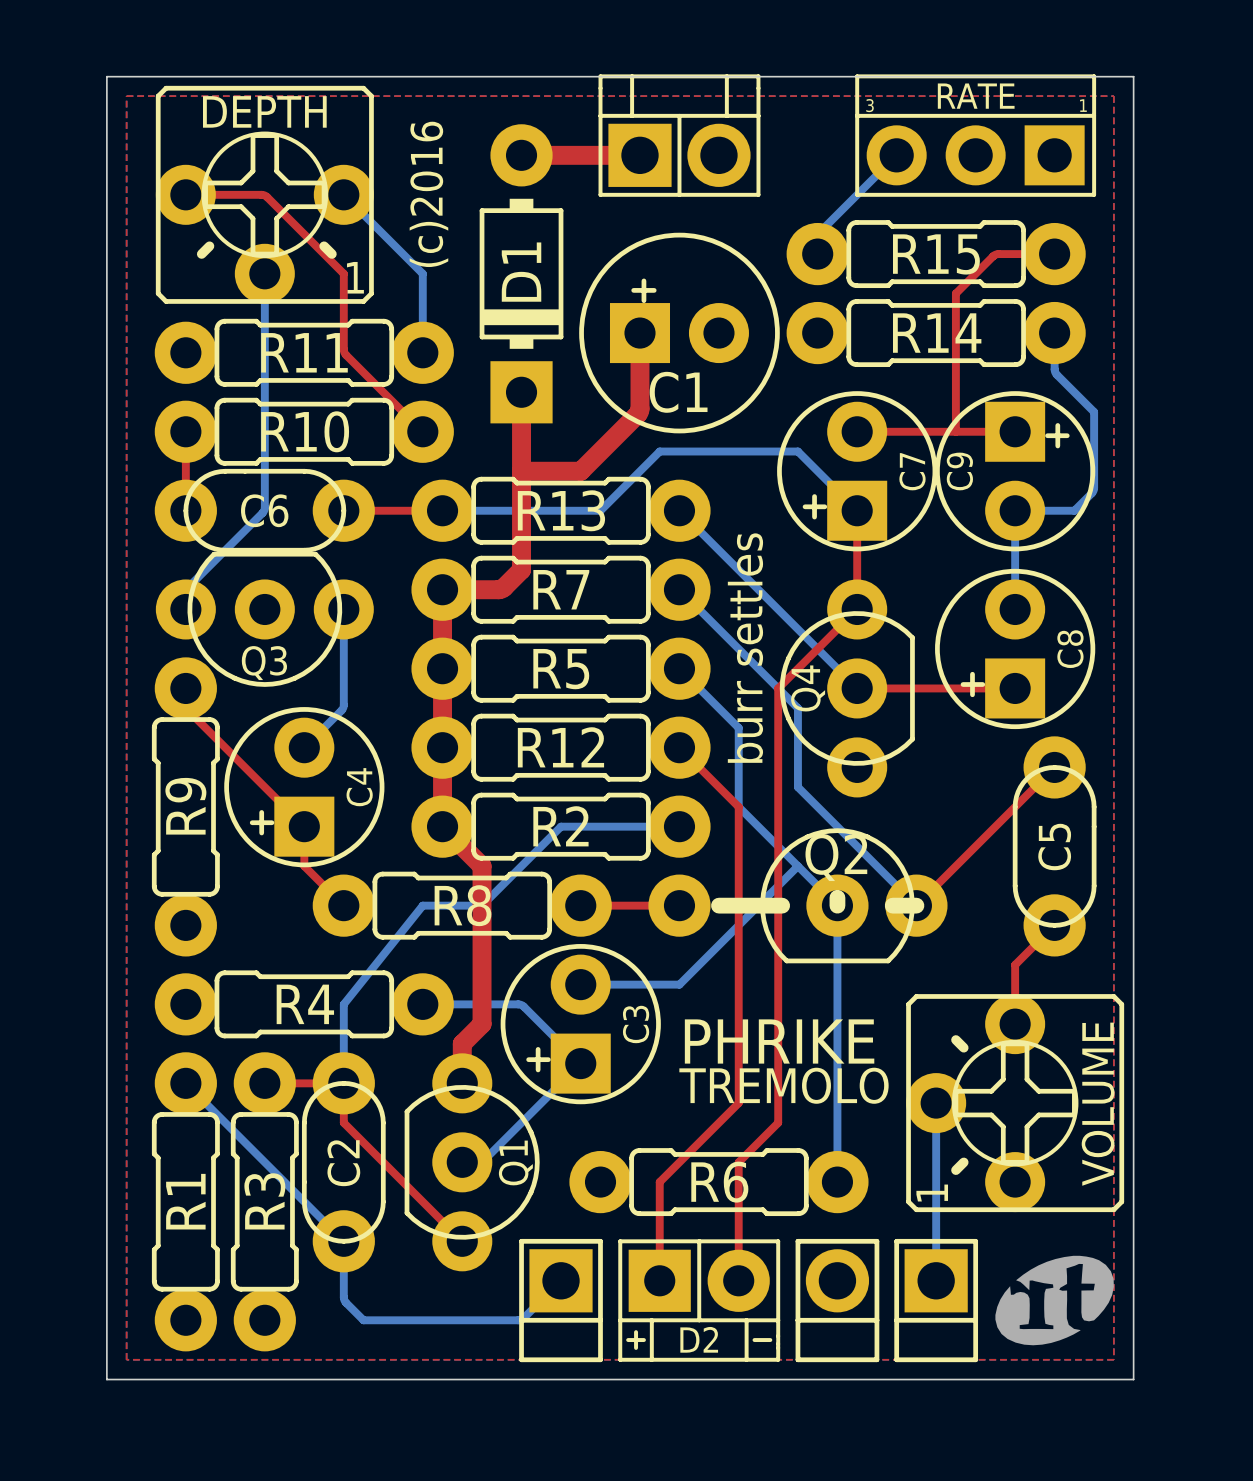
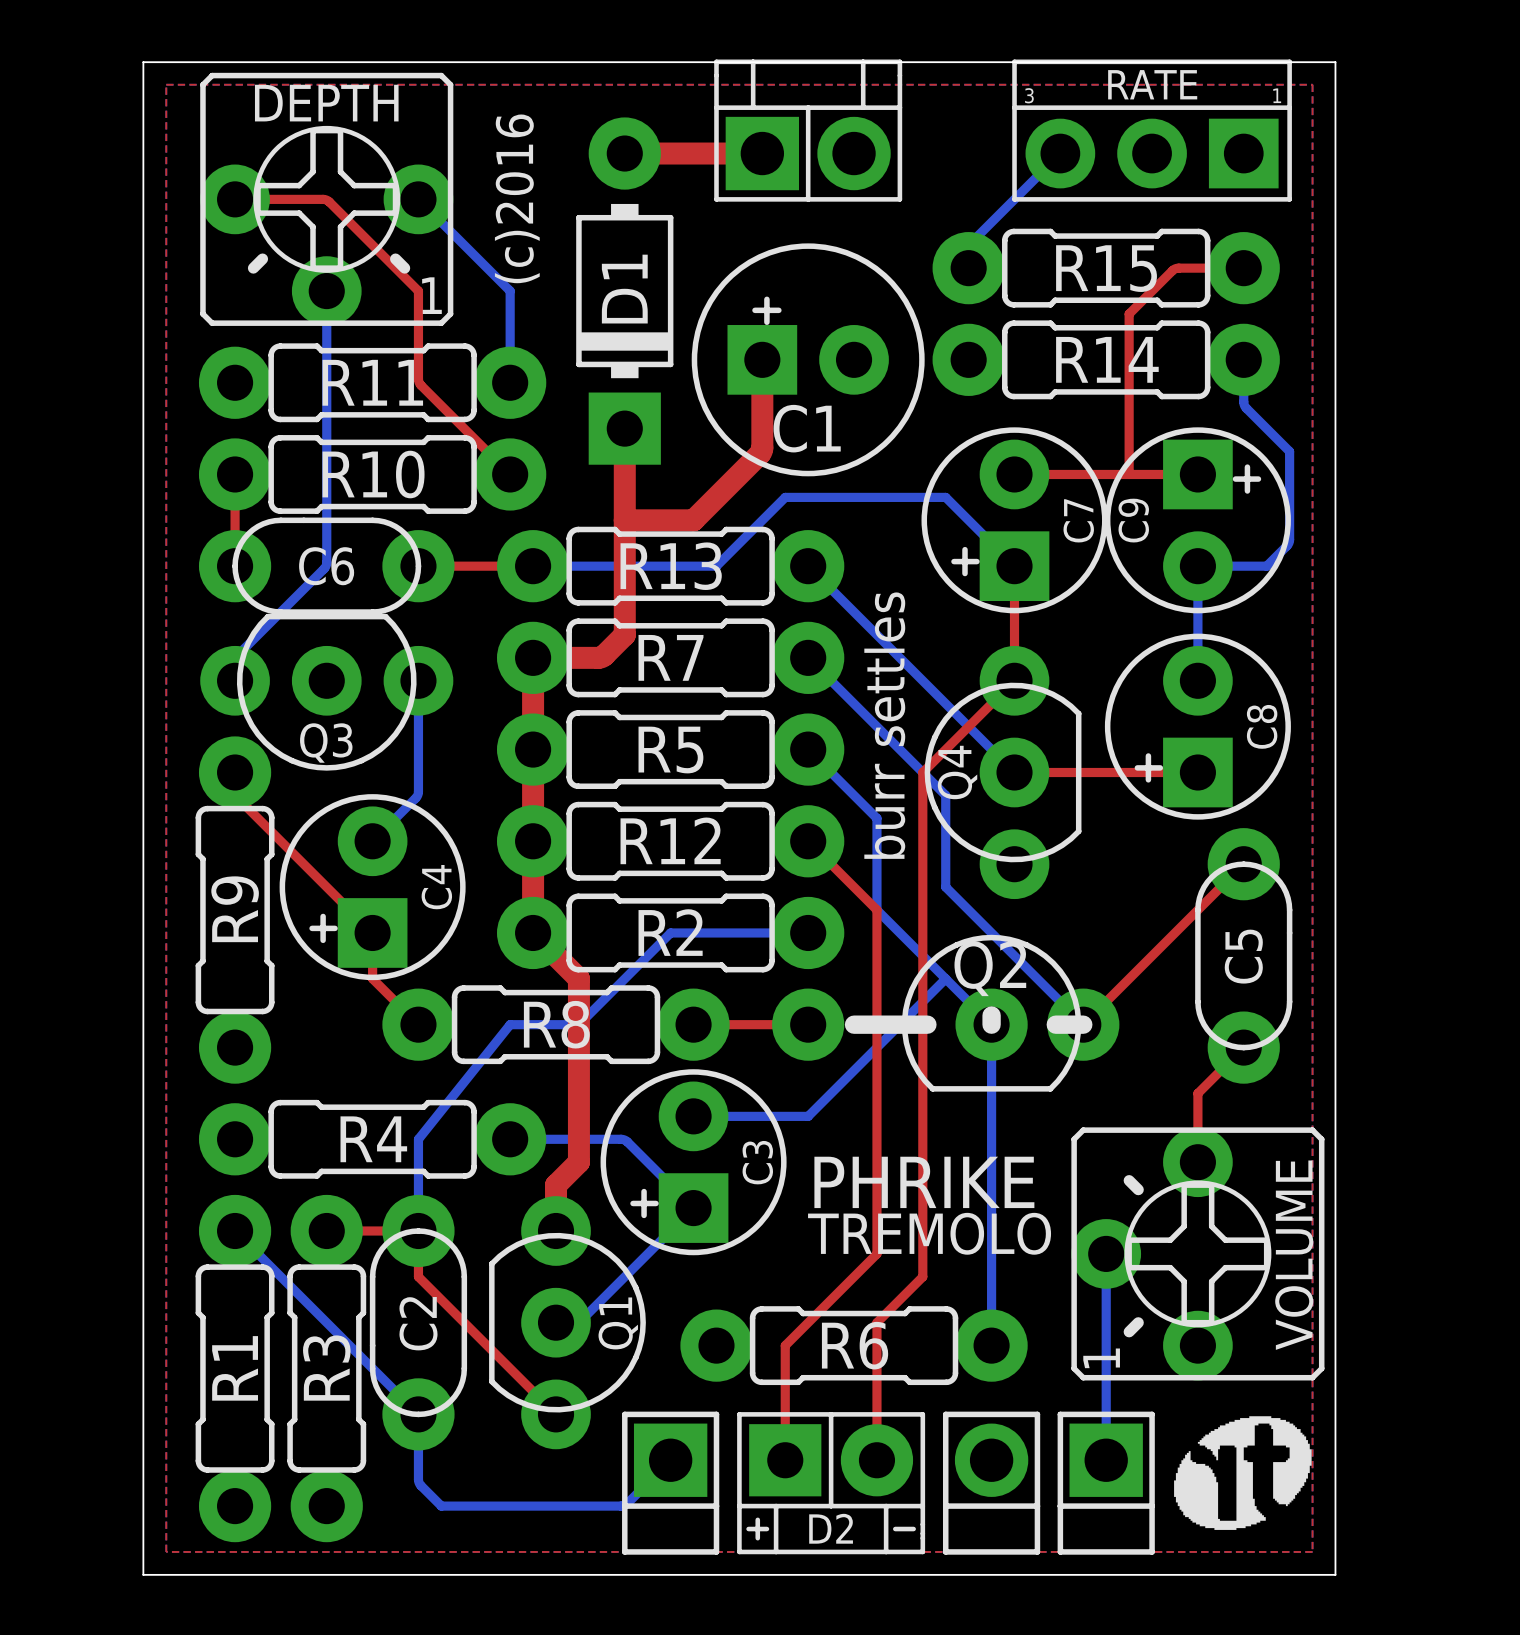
drawing shape: [995, 1255, 1114, 1346] -> [1174, 1416, 1312, 1530]

